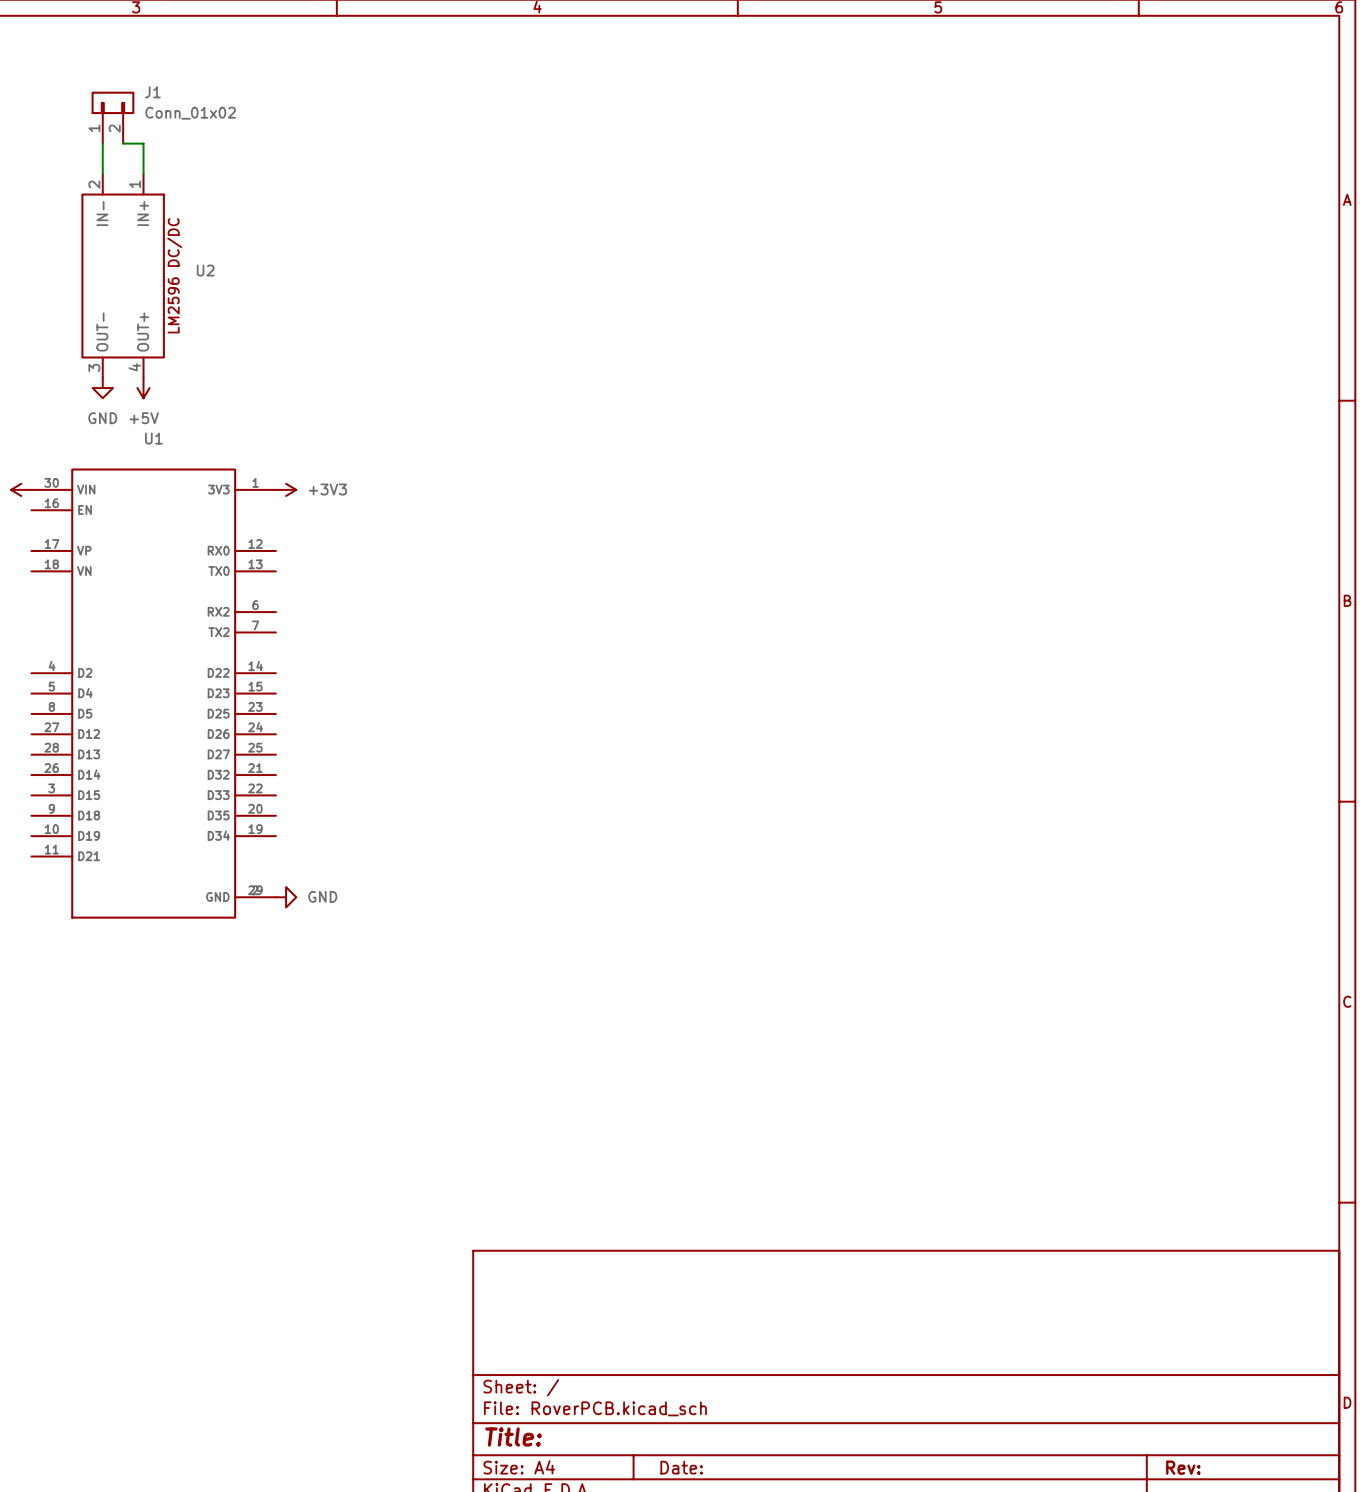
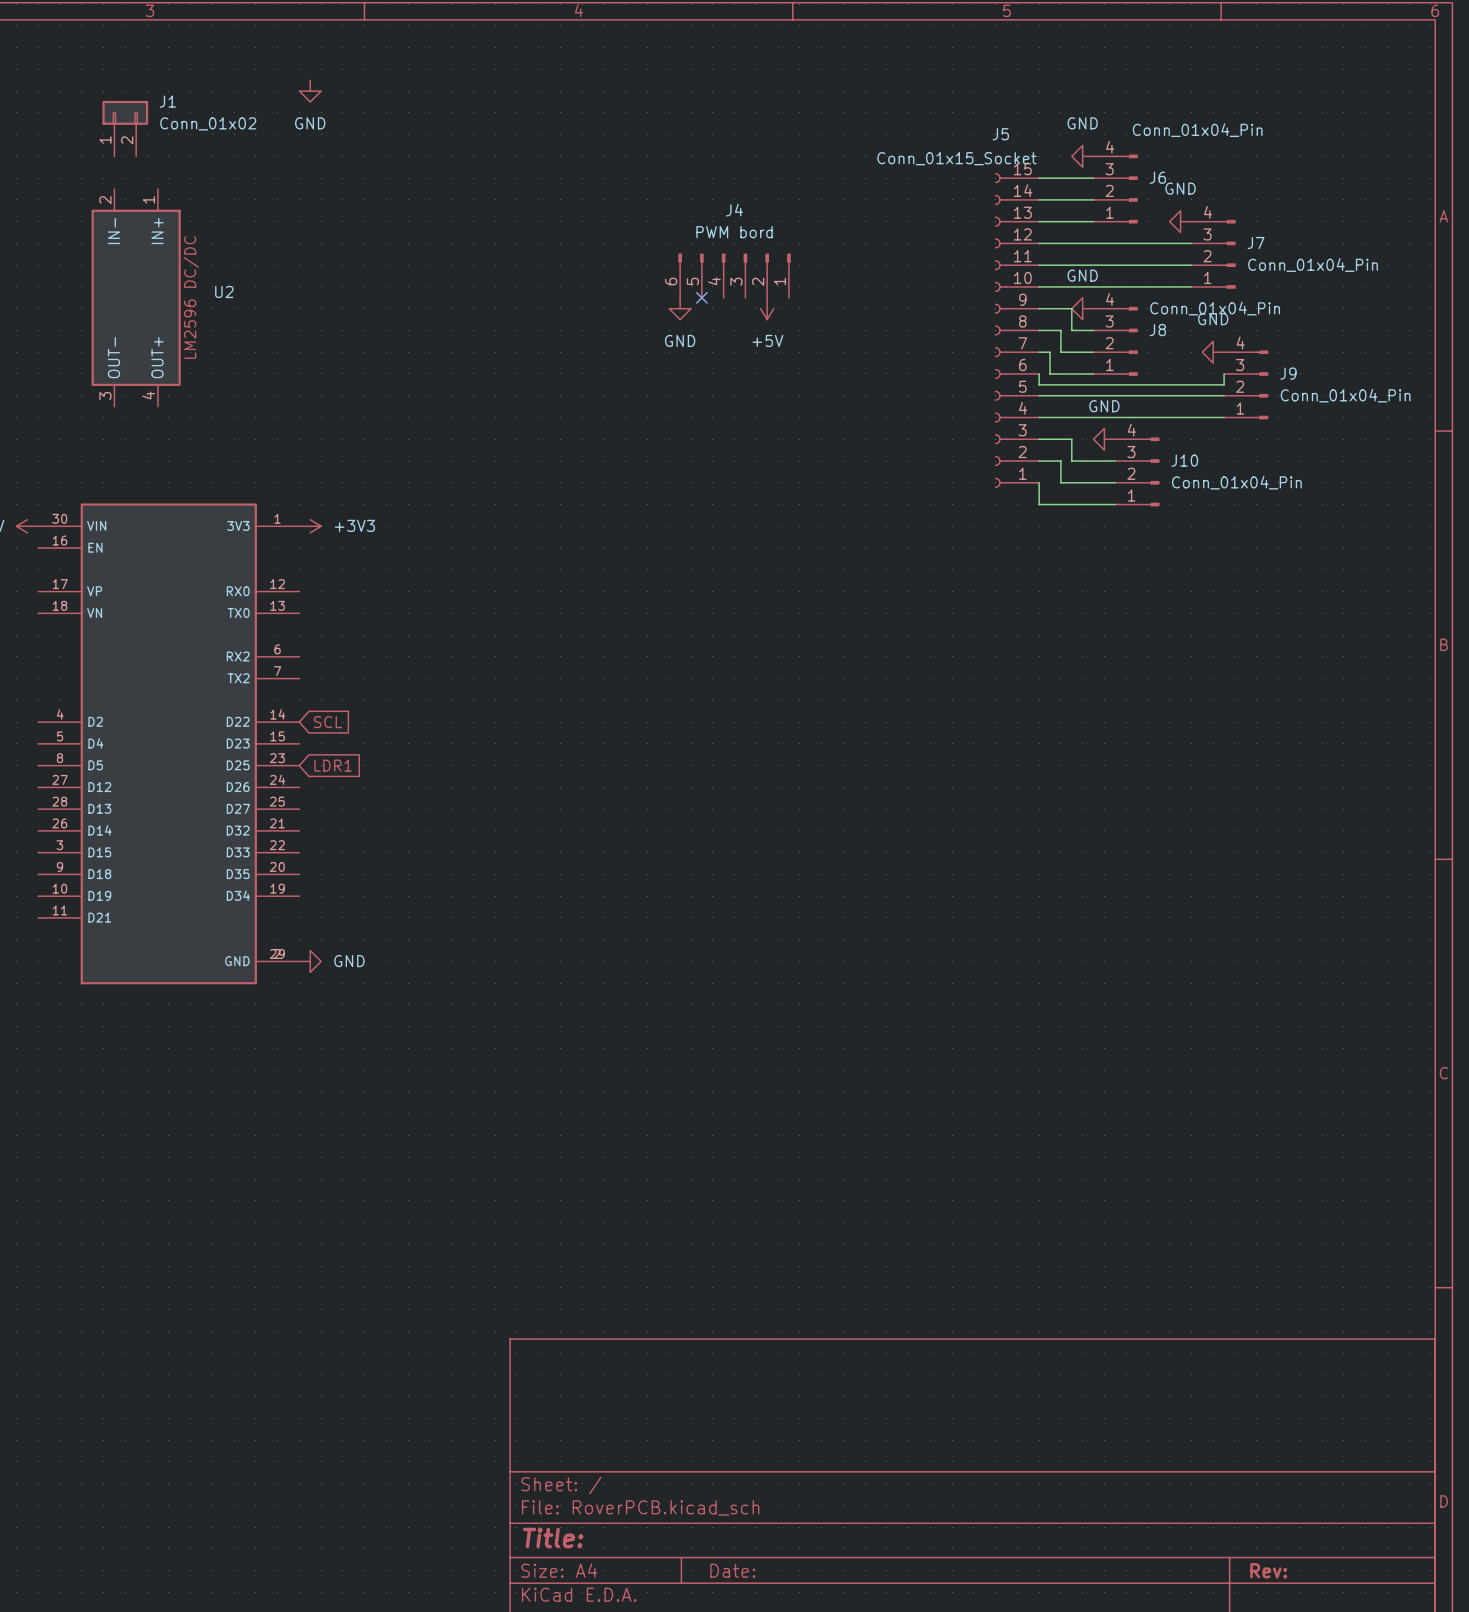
power symbol: none -> GND (310, 91)
wire: (102, 143) (102, 174) -> none
wire: (123, 143) (143, 143) (143, 174) -> none
power symbol: none -> GND (1082, 156)
wire: none -> (1039, 178) (1093, 178)
J6: none -> Conn_01x04_Pin (1115, 189)
wire: none -> (1039, 199) (1093, 199)
wire: none -> (1039, 221) (1093, 221)
power symbol: none -> GND (1180, 221)
wire: none -> (1039, 243) (1191, 243)
J7: none -> Conn_01x04_Pin (1213, 254)
wire: none -> (1039, 265) (1191, 265)
J4: none -> PWM bord (734, 275)
wire: none -> (1039, 286) (1191, 286)
no-connect mark: none -> (701, 297)
power symbol: none -> GND (680, 308)
power symbol: none -> +5V (767, 308)
wire: none -> (1039, 308) (1071, 308) (1071, 330) (1093, 330)
power symbol: none -> GND (1082, 308)
J5: none -> Conn_01x15_Socket (1017, 330)
wire: none -> (1039, 330) (1060, 330) (1060, 352) (1093, 352)
J8: none -> Conn_01x04_Pin (1115, 341)
wire: none -> (1039, 352) (1050, 352) (1050, 373) (1093, 373)
power symbol: none -> GND (1213, 352)
wire: none -> (1039, 373) (1039, 384) (1224, 384) (1224, 373)
J9: none -> Conn_01x04_Pin (1246, 384)
wire: none -> (1039, 395) (1224, 395)
power symbol: GND (102, 388) -> none
power symbol: +5V (143, 388) -> none
wire: none -> (1039, 417) (1224, 417)
wire: none -> (1039, 439) (1071, 439) (1071, 461) (1115, 461)
power symbol: none -> GND (1104, 439)
wire: none -> (1039, 461) (1060, 461) (1060, 482) (1115, 482)
U1 name: U1 (153, 438) -> none
J10: none -> Conn_01x04_Pin (1137, 471)
wire: none -> (1039, 482) (1039, 504) (1115, 504)
global label: none -> SCL (327, 722)
global label: none -> LDR1 (333, 765)

